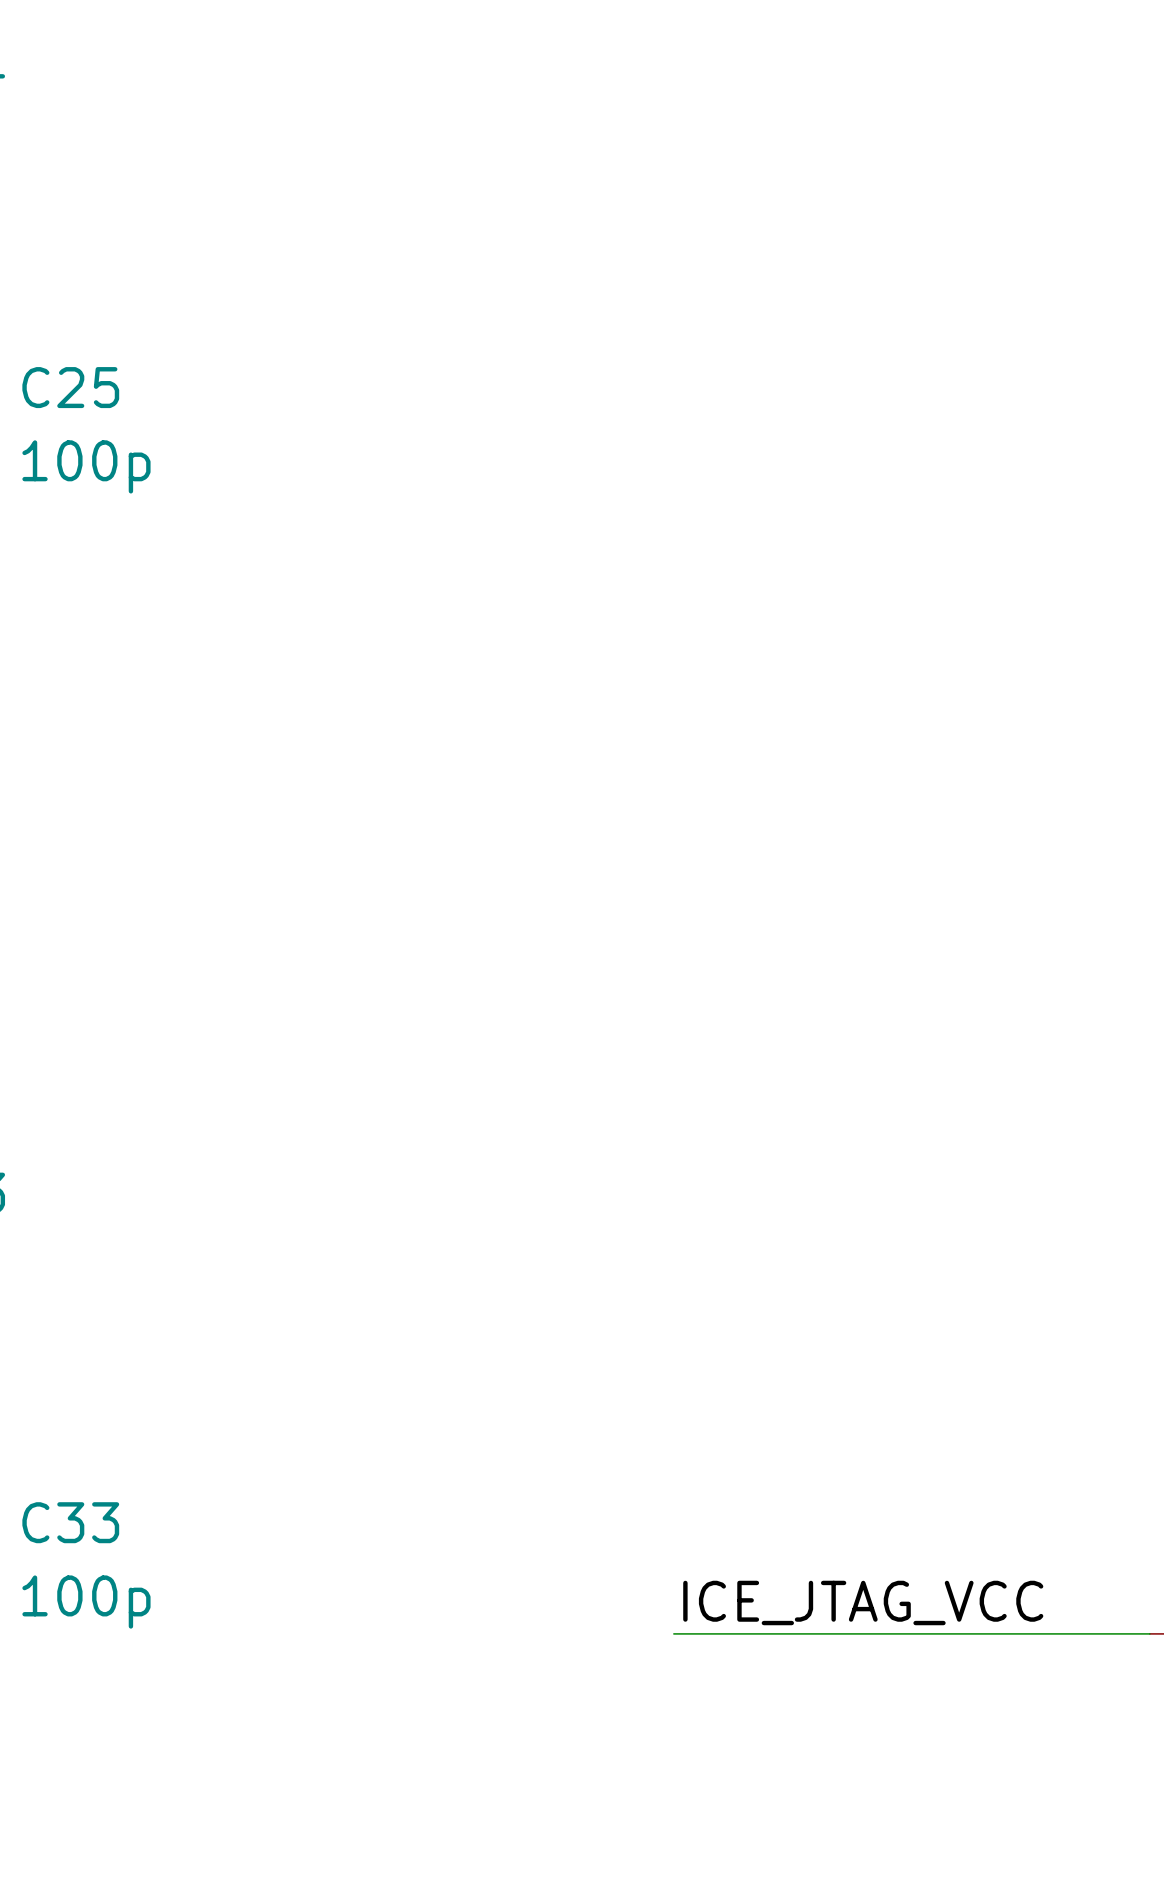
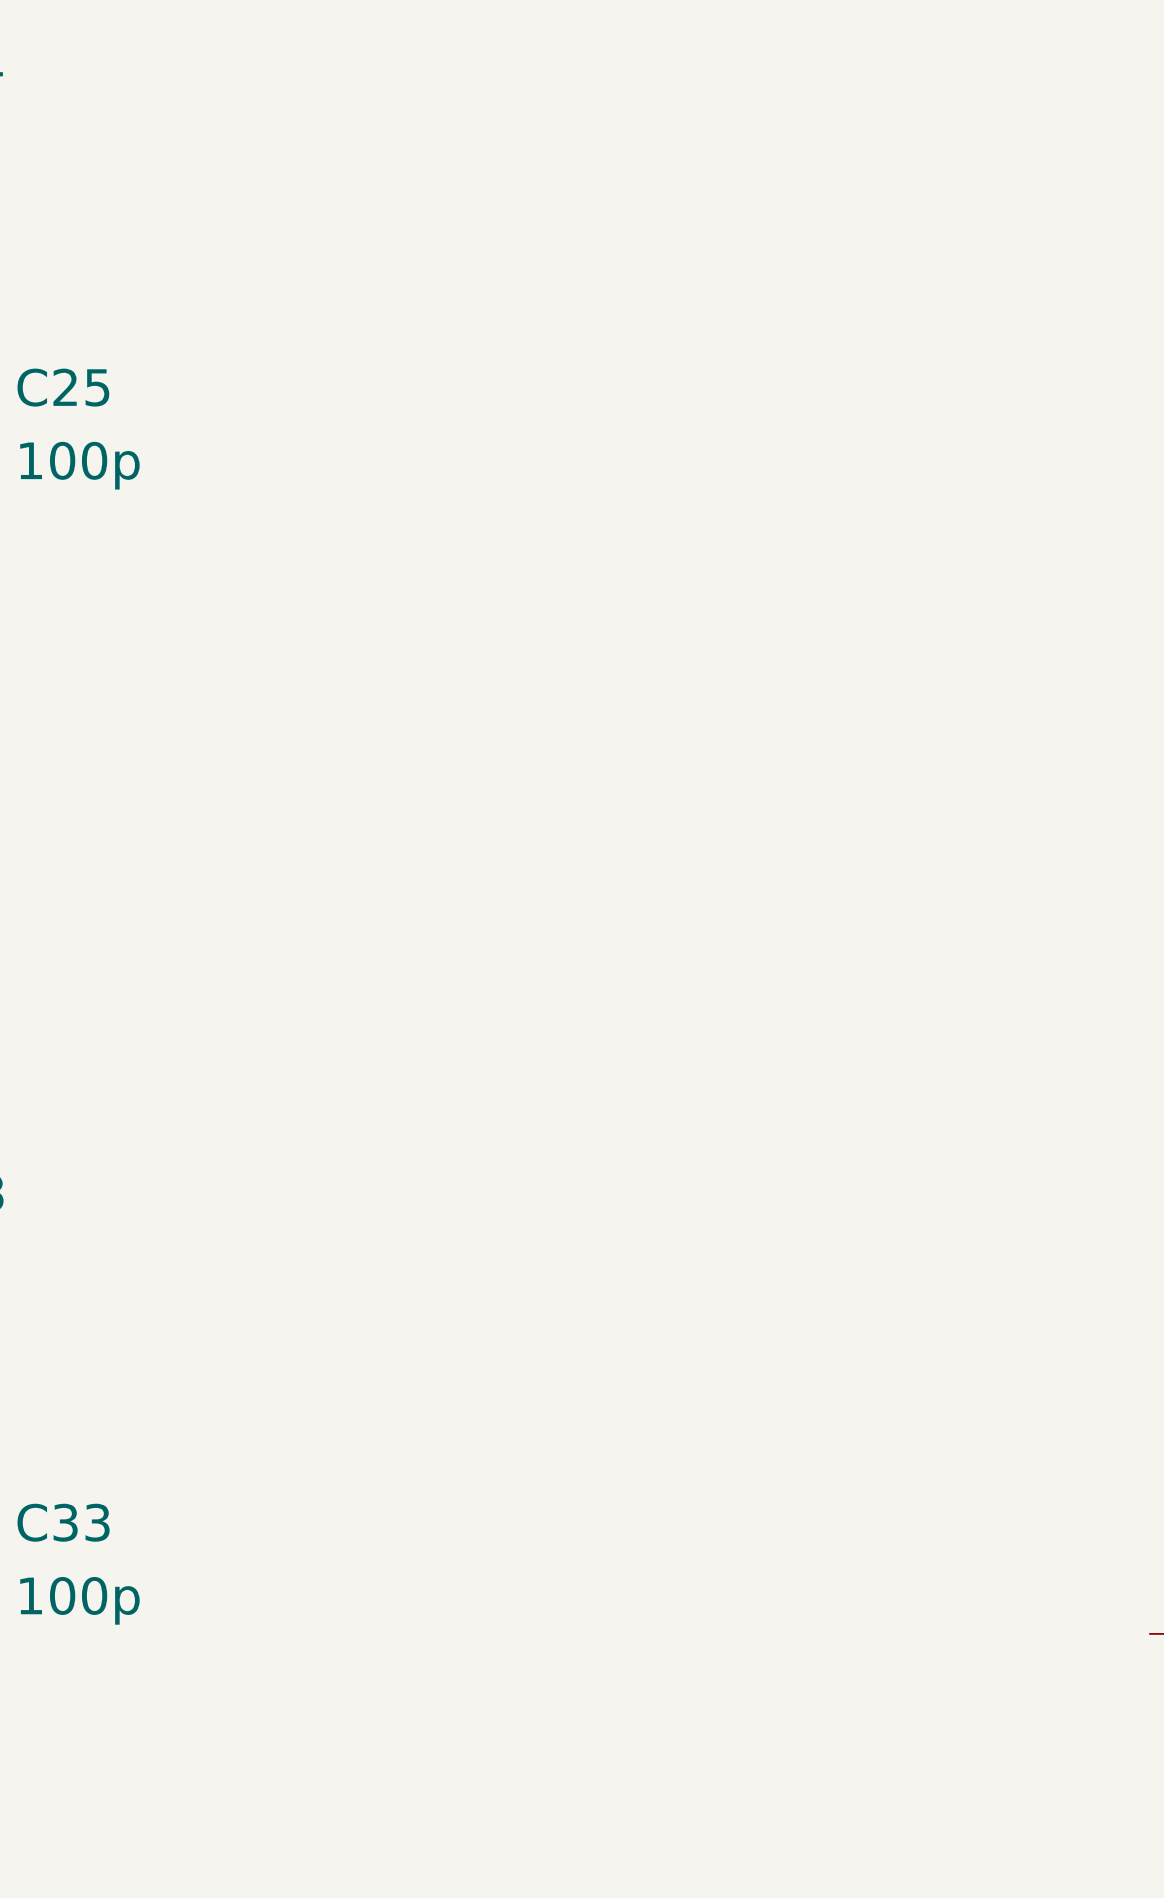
label: ICE_JTAG_VCC (863, 1602) -> none
wire: (673, 1633) (1149, 1633) -> none

